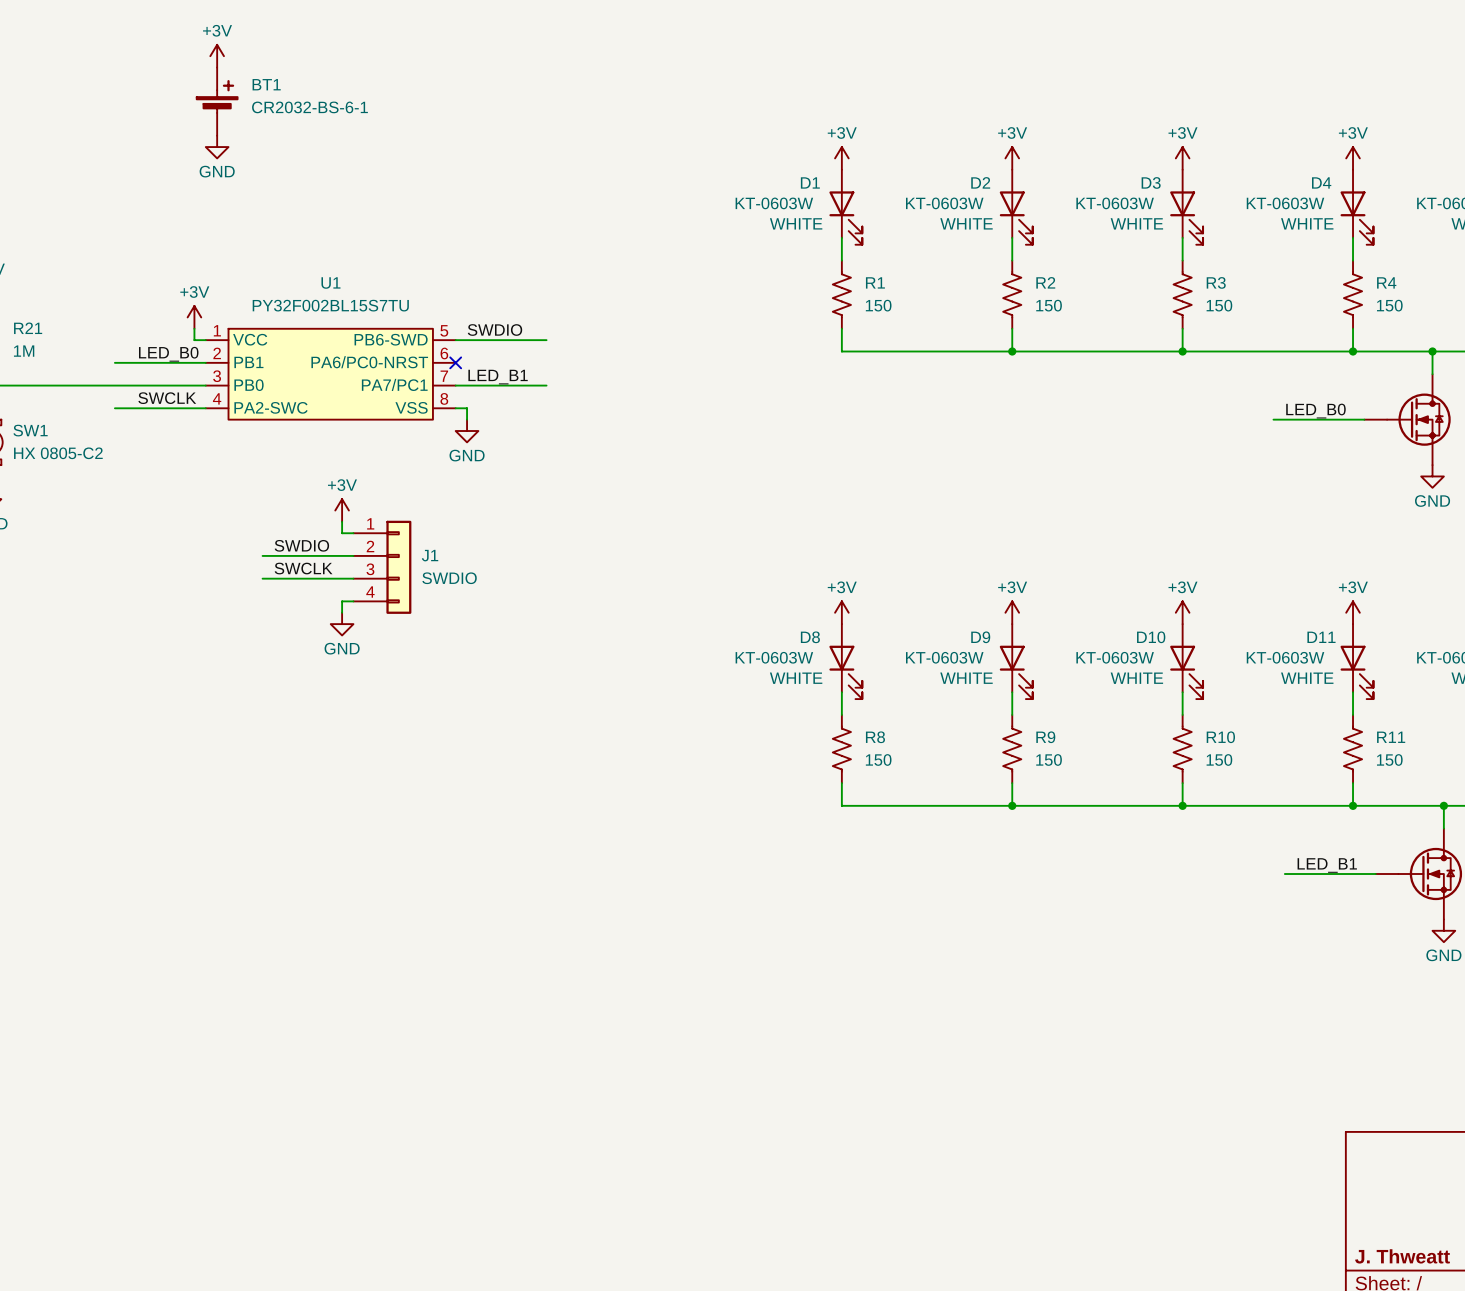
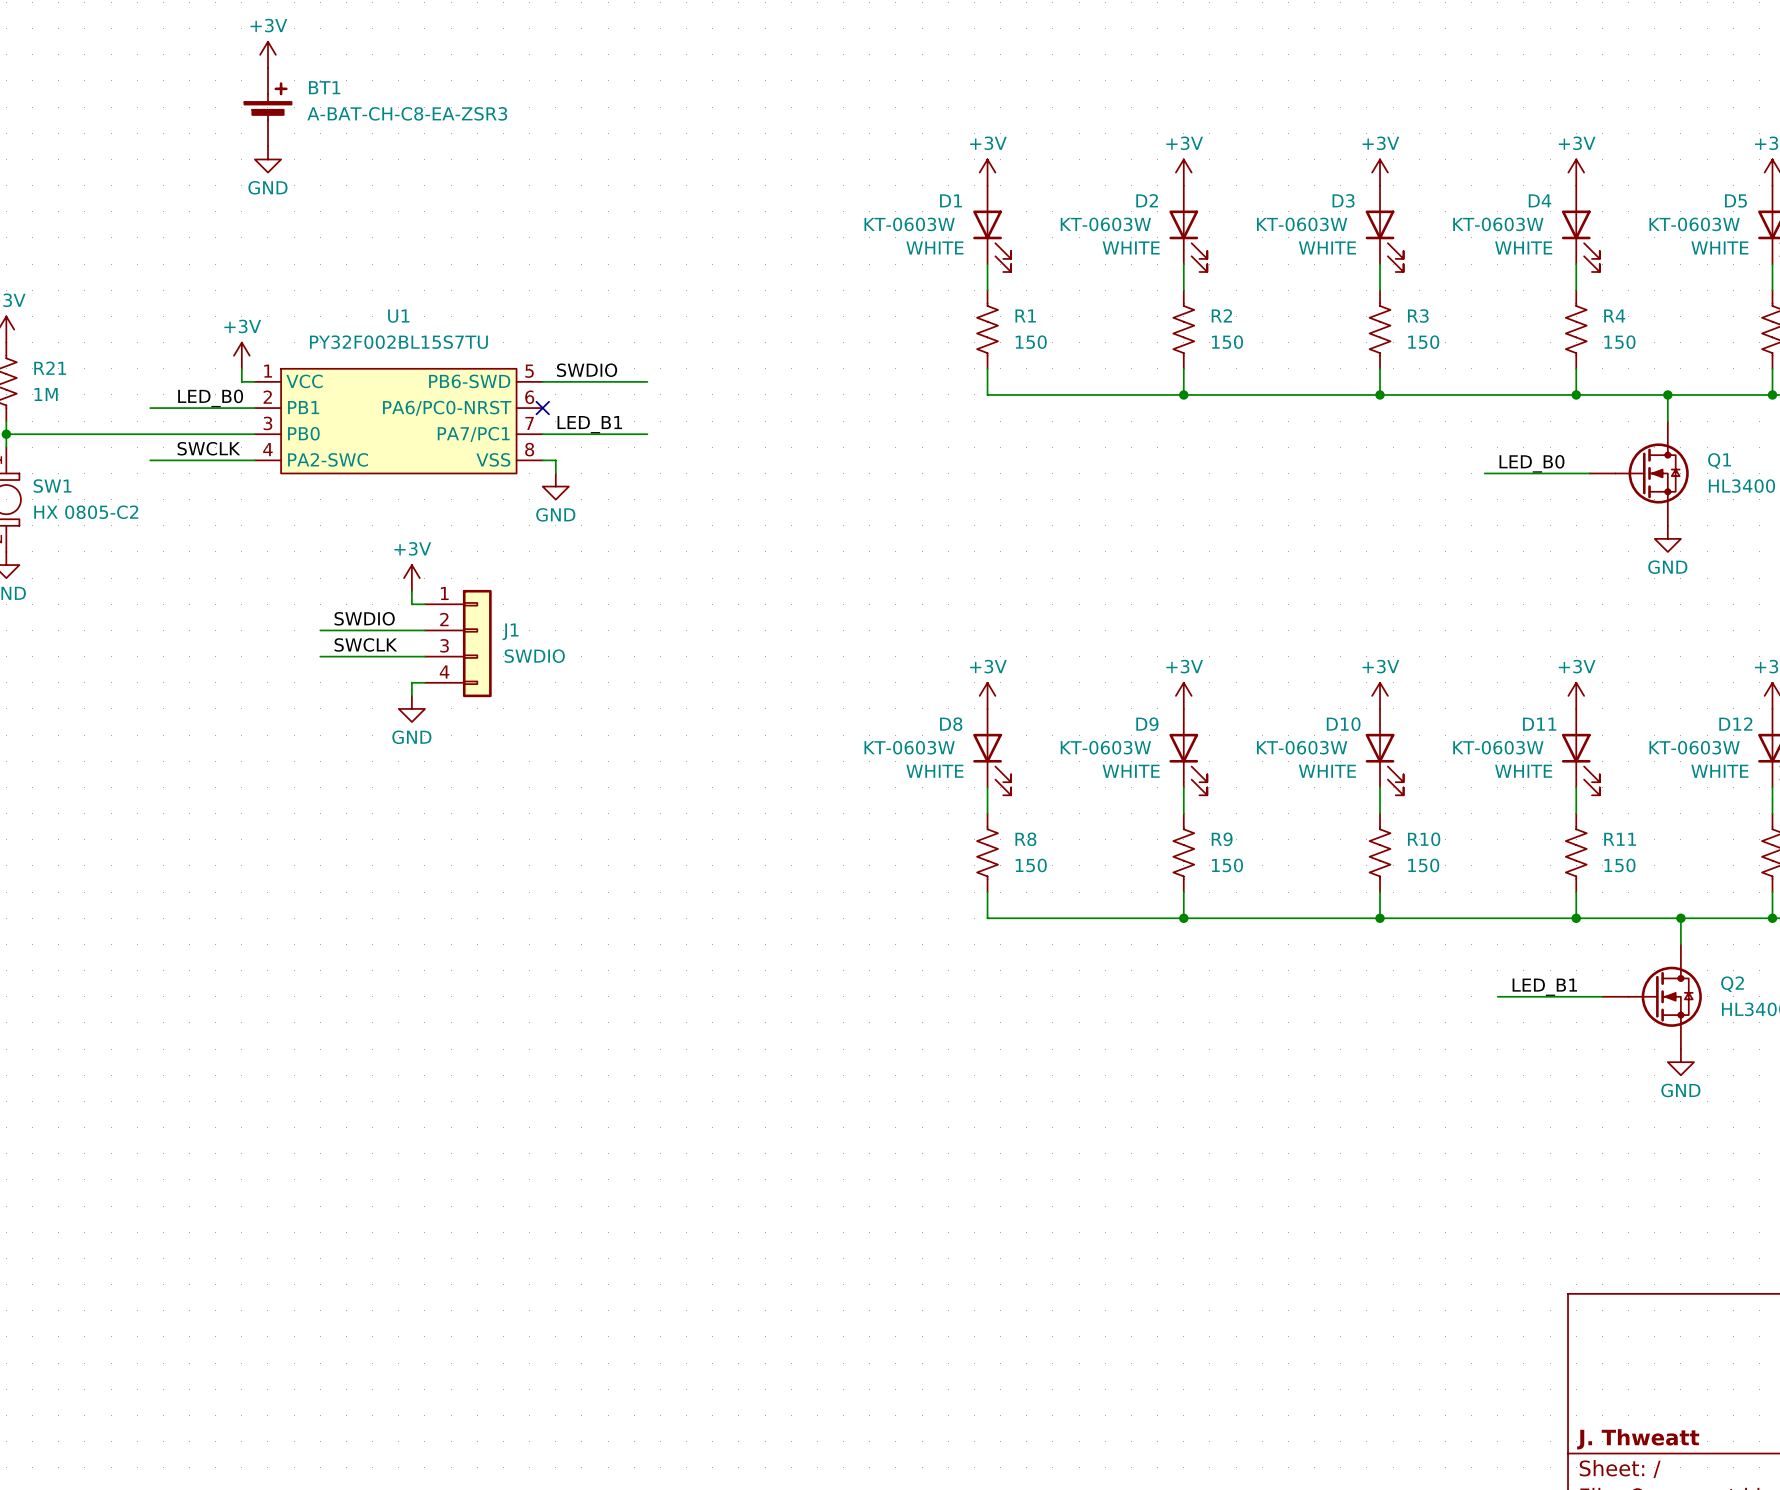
BT1 value: CR2032-BS-6-1 (309, 107) -> A-BAT-CH-C8-EA-ZSR3 (407, 113)

